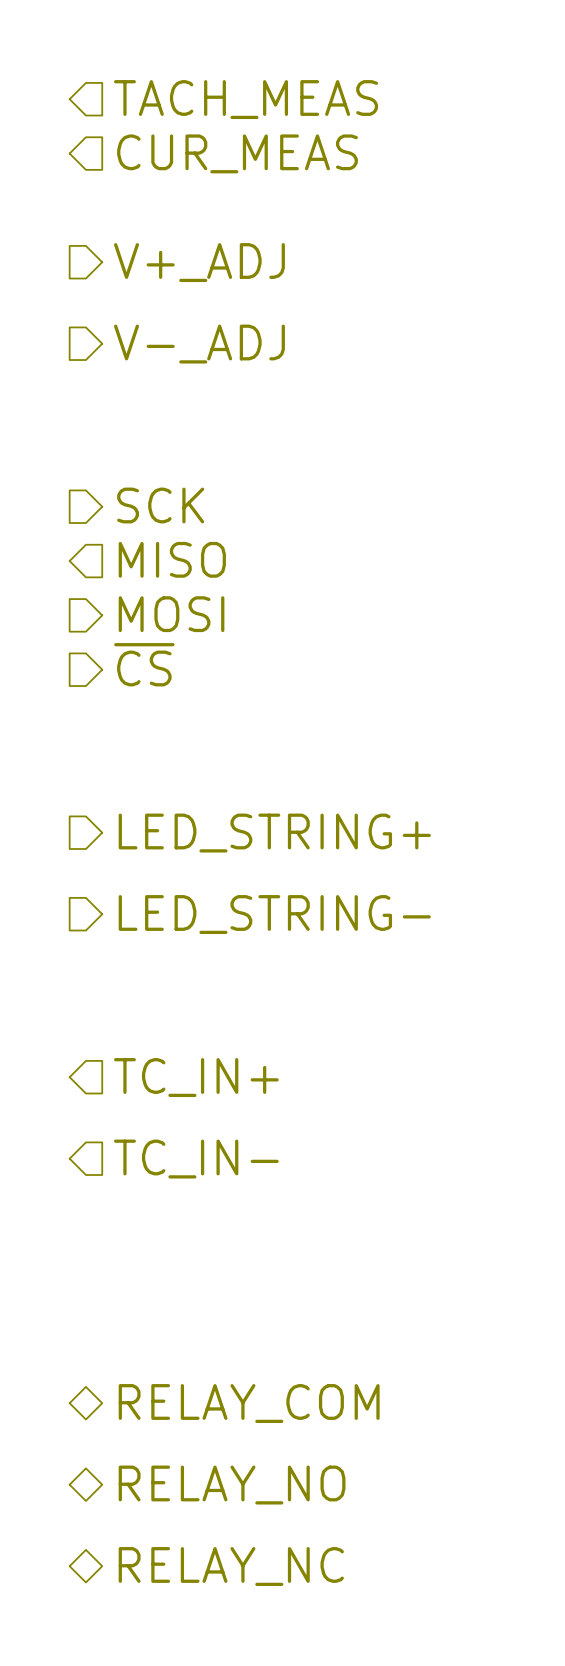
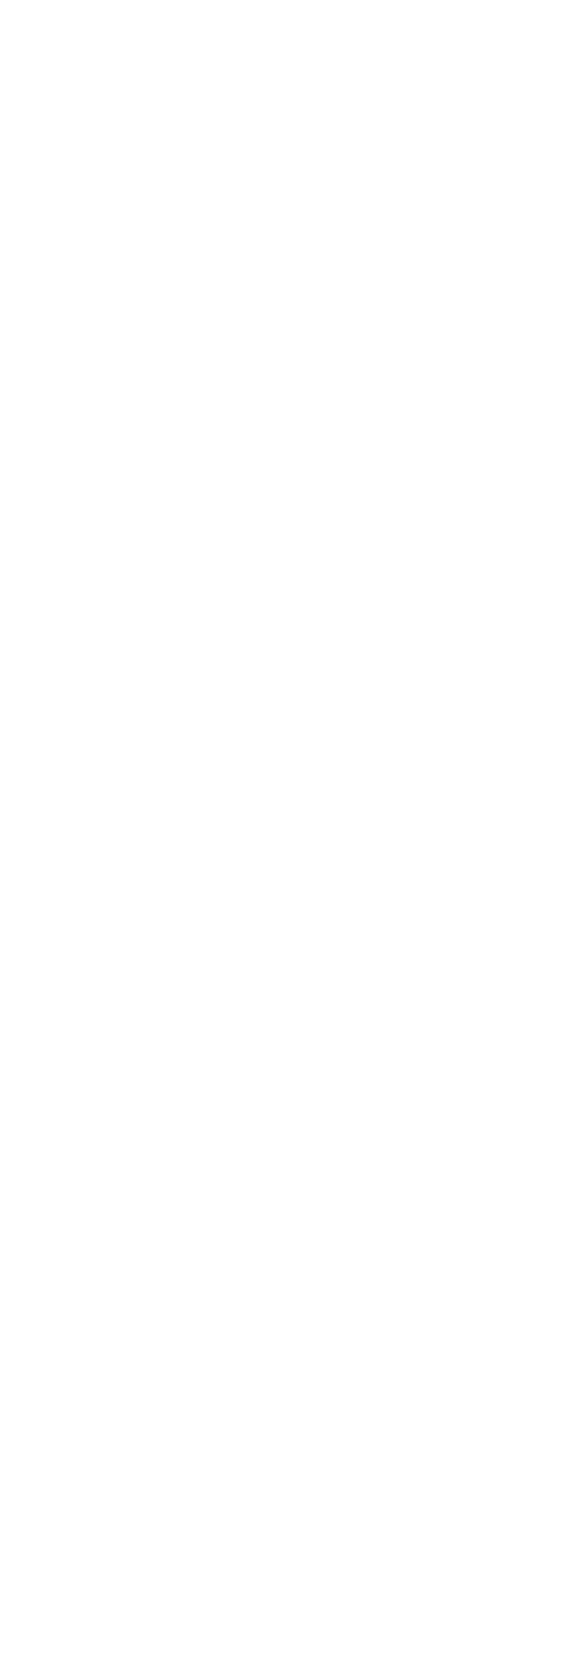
hierarchical label: TACH_MEAS (246, 99) -> none
hierarchical label: CUR_MEAS (237, 153) -> none
hierarchical label: V+_ADJ (199, 262) -> none
hierarchical label: V-_ADJ (199, 344) -> none
hierarchical label: SCK (160, 505) -> none
hierarchical label: MISO (172, 559) -> none
hierarchical label: MOSI (171, 614) -> none
hierarchical label: ~{CS} (144, 664) -> none
hierarchical label: LED_STRING+ (274, 833) -> none
hierarchical label: LED_STRING- (274, 914) -> none
hierarchical label: TC_IN+ (196, 1077) -> none
hierarchical label: TC_IN- (196, 1159) -> none
hierarchical label: RELAY_COM (249, 1403) -> none
hierarchical label: RELAY_NO (232, 1485) -> none
hierarchical label: RELAY_NC (231, 1566) -> none

